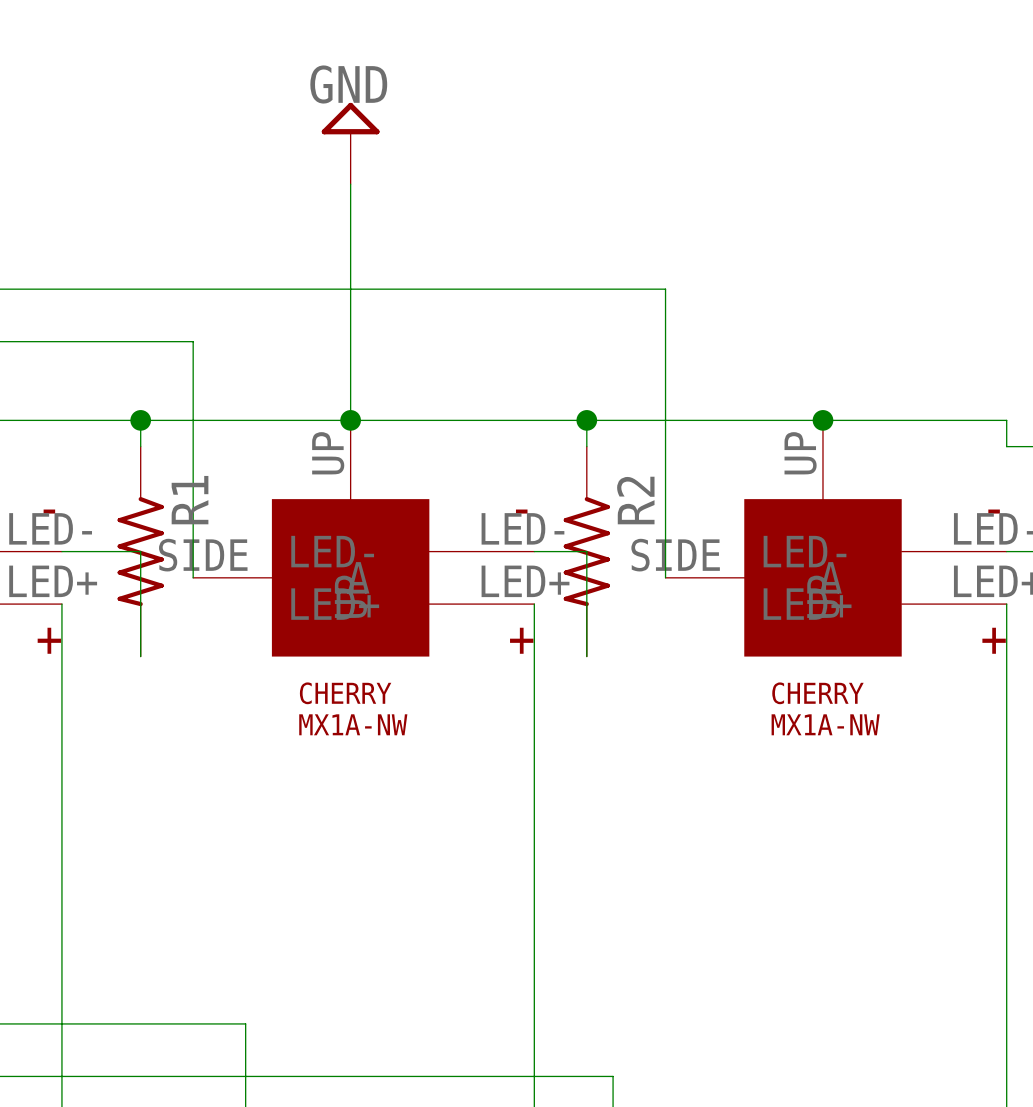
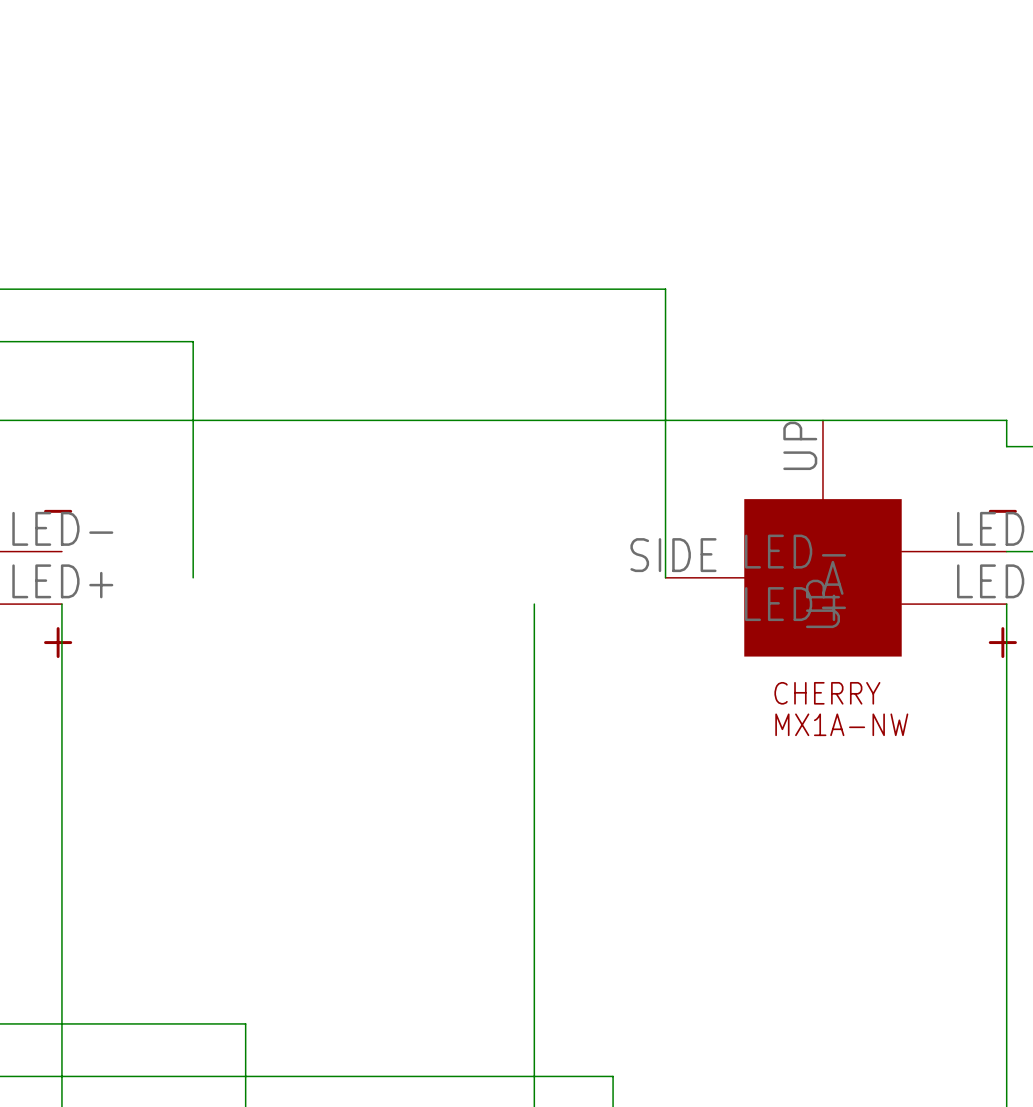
power symbol: GND (350, 143) -> none
wire: (350, 184) (350, 420) -> none
wire: (140, 420) (140, 446) -> none
junction: (140, 420) -> none
junction: (350, 420) -> none
wire: (586, 420) (586, 446) -> none
junction: (586, 420) -> none
junction: (822, 420) -> none
part: (363, 538) -> none
wire: (61, 551) (140, 551) (140, 656) -> none
R1: (140, 551) -> none
wire: (534, 551) (586, 551) (586, 656) -> none
R2: (586, 551) -> none

